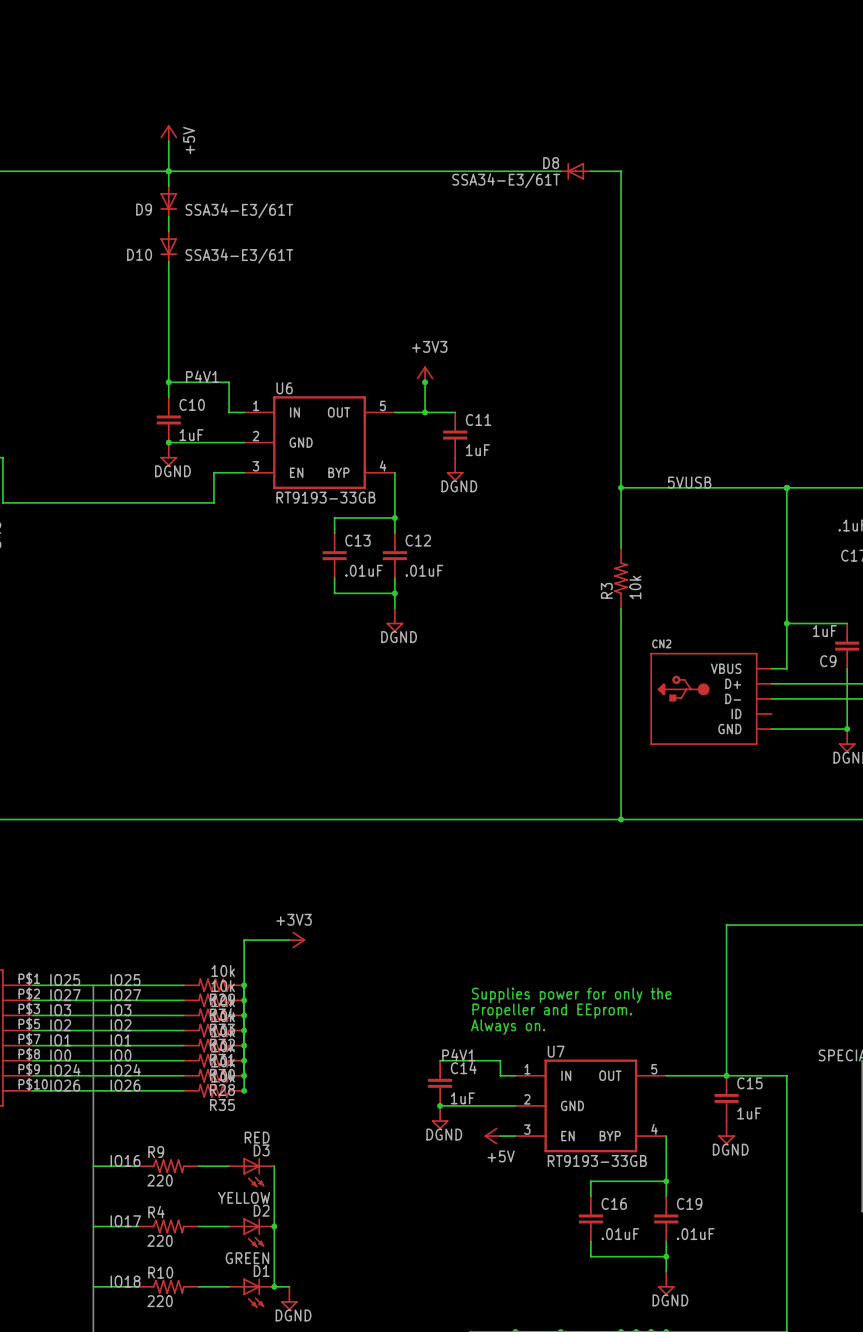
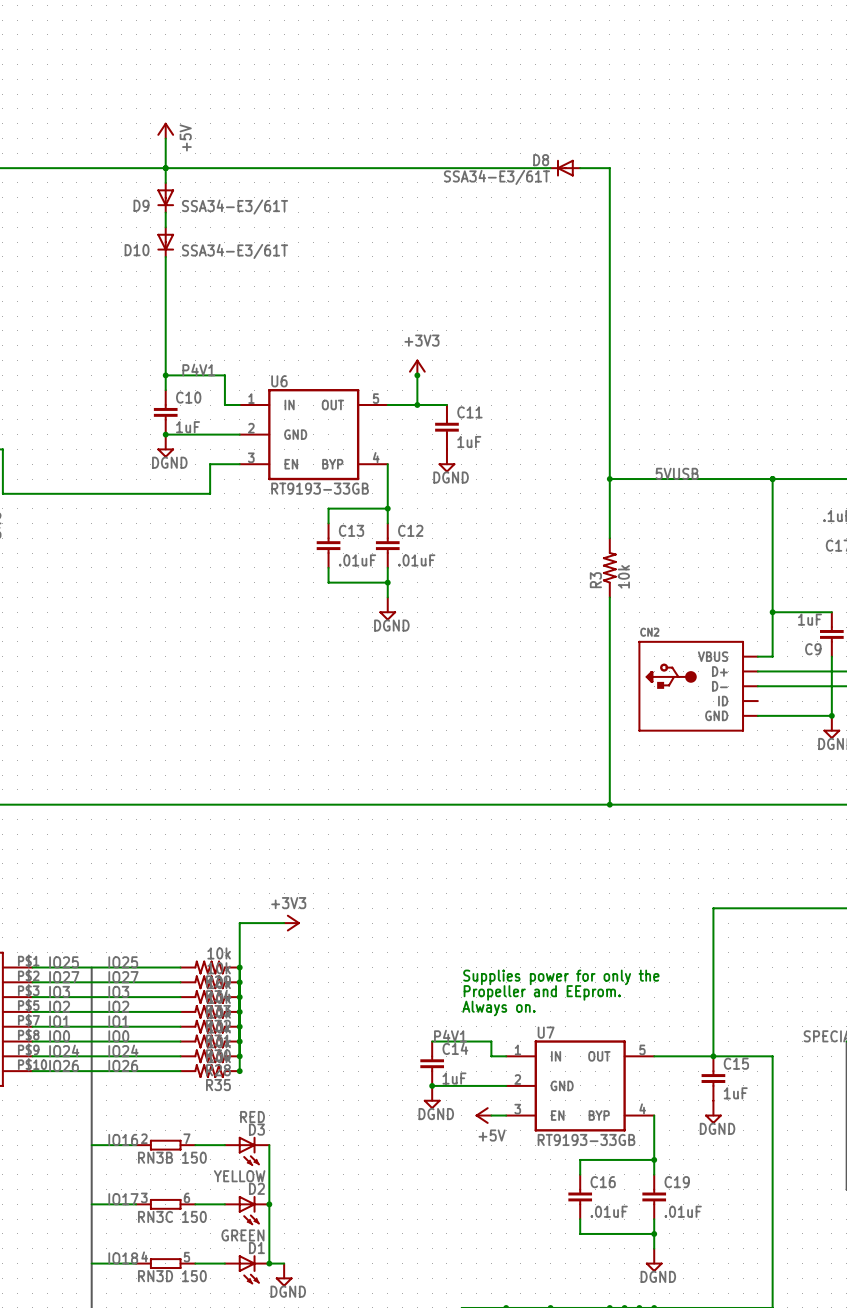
R9: 220 (168, 1166) -> none
RN3B: none -> 150 (165, 1145)
R4: 220 (168, 1226) -> none
RN3C: none -> 150 (165, 1204)
R10: 220 (168, 1286) -> none
RN3D: none -> 150 (165, 1263)

